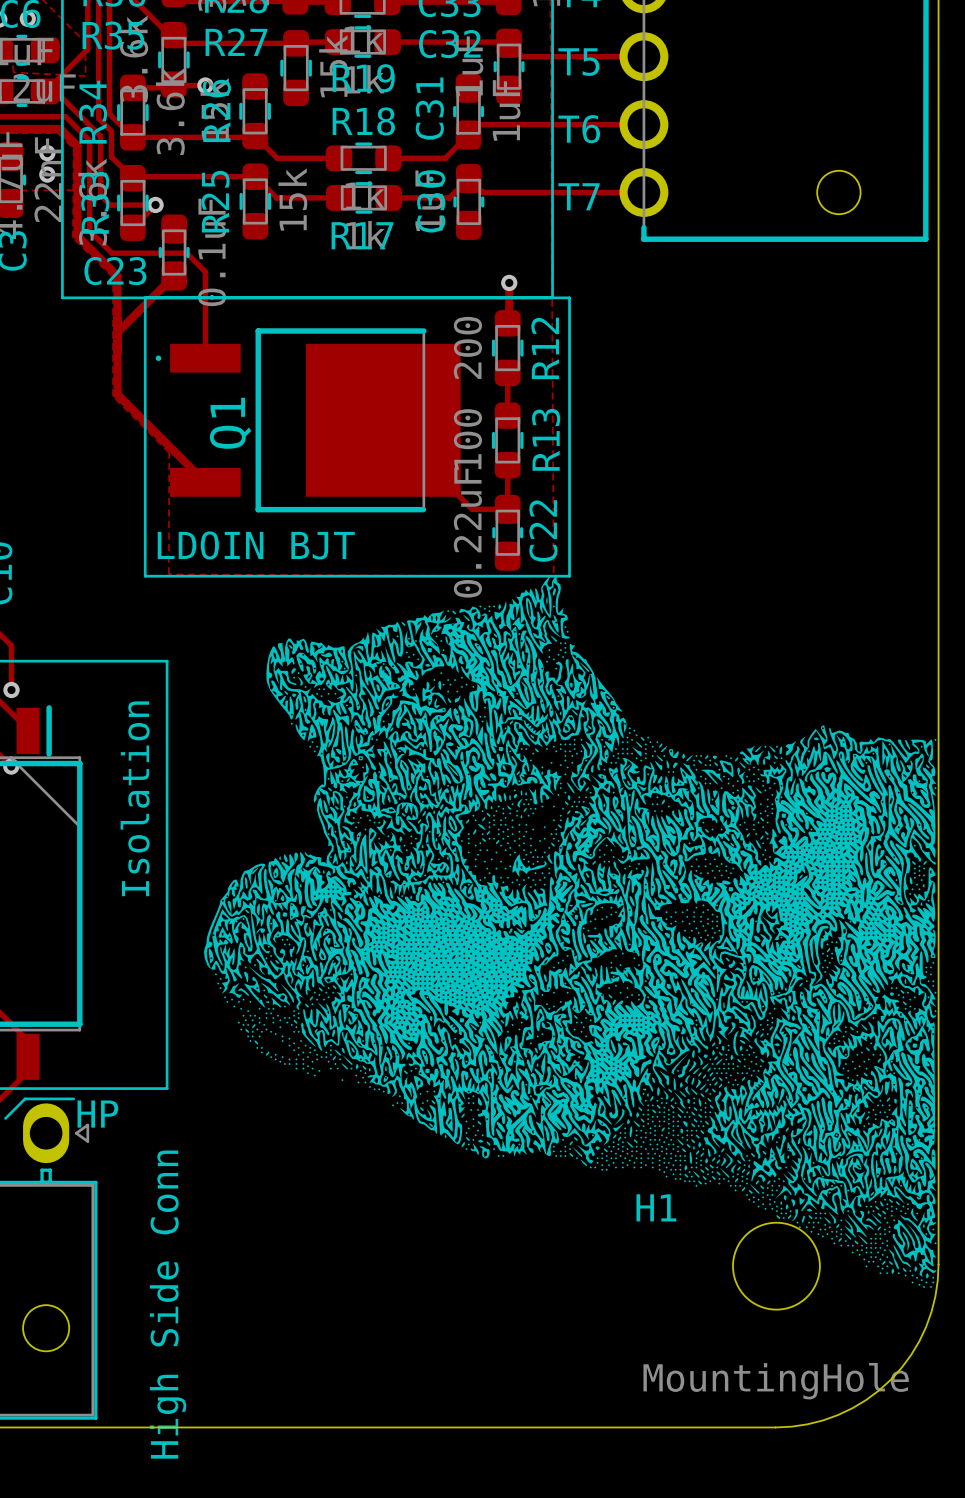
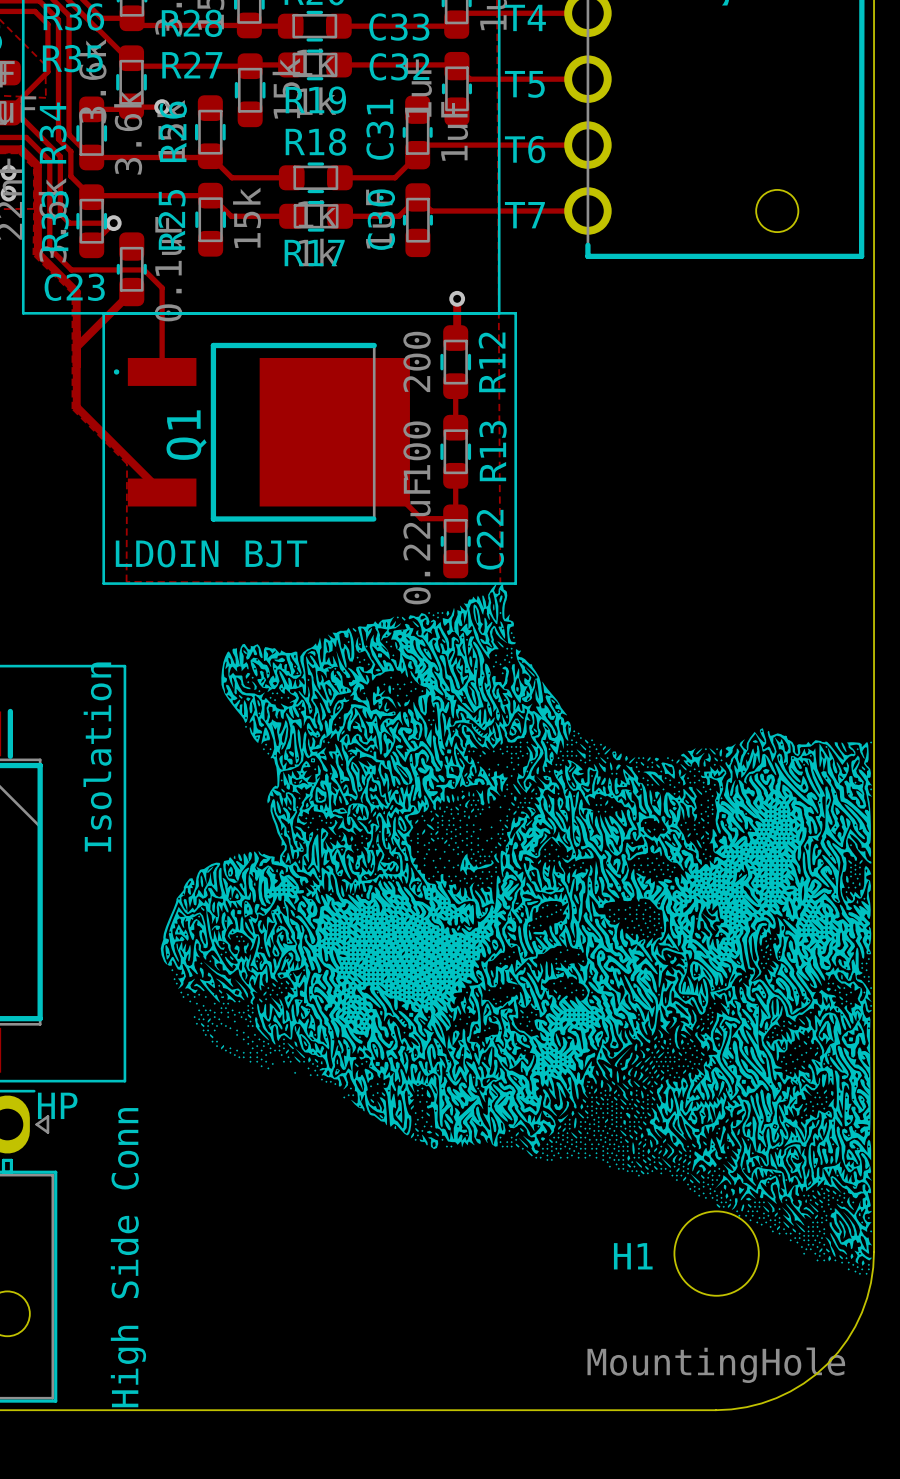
text position: Isolation (135, 798) -> Isolation (97, 757)
H1 name position: H1 (656, 1207) -> H1 (633, 1256)
text position: High Side Conn (168, 1304) -> High Side Conn (128, 1257)

